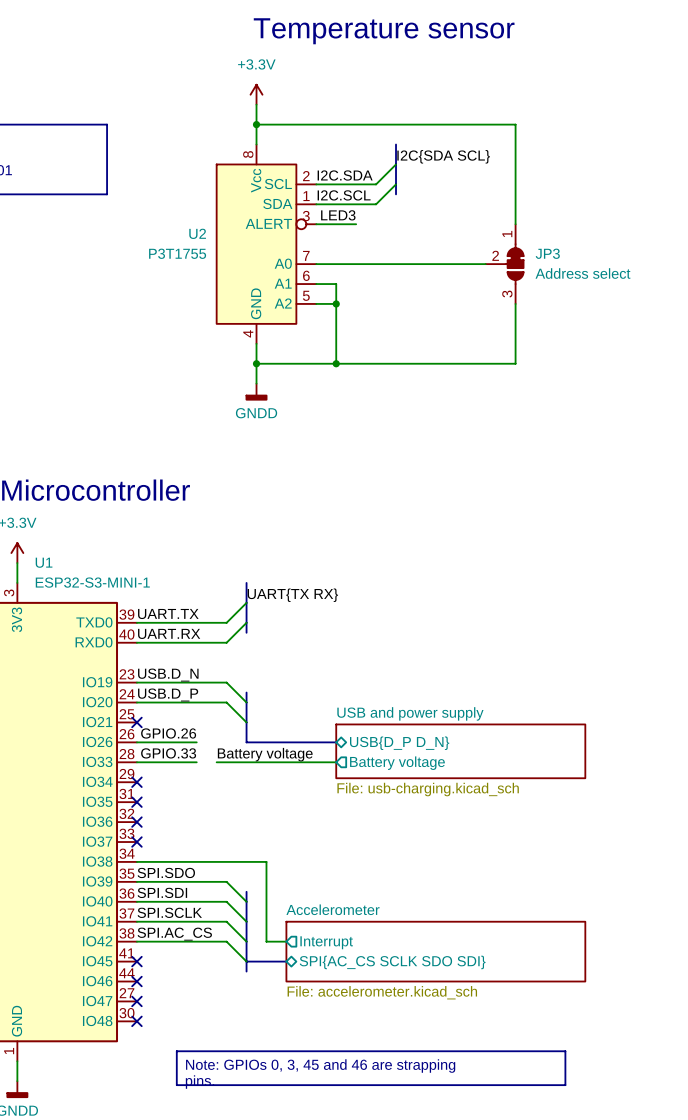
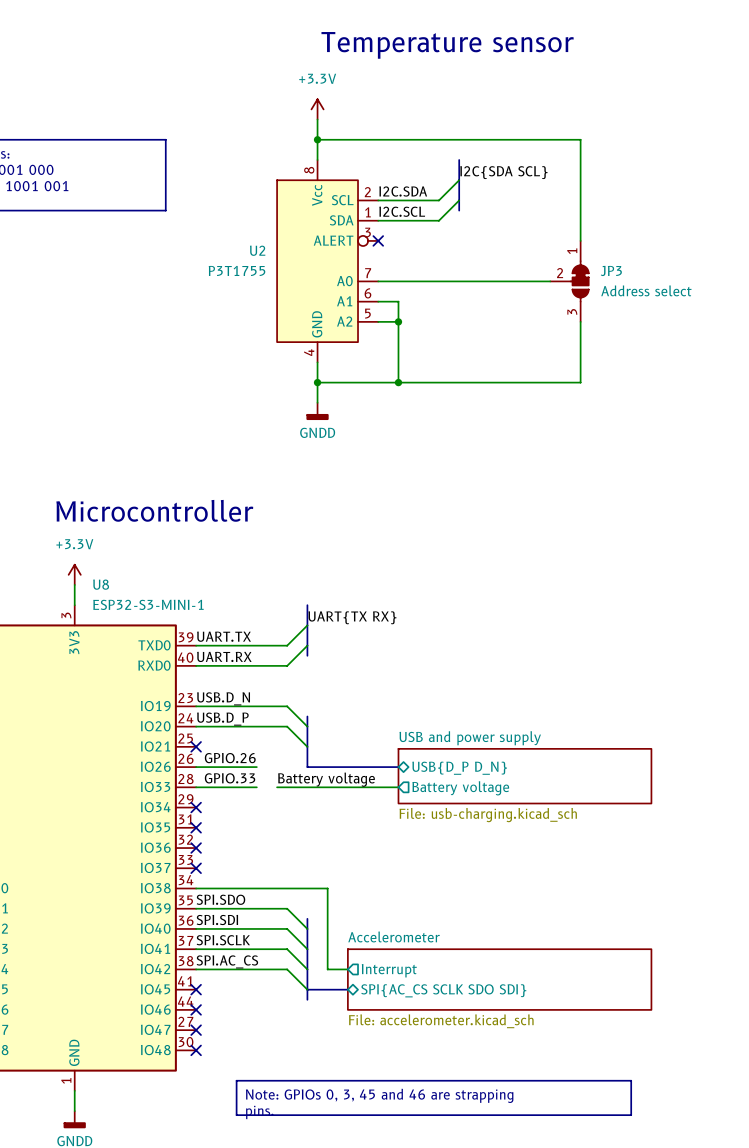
label: LED3 (338, 215) -> none
wire: (316, 224) (356, 224) -> none
no-connect mark: none -> (378, 240)
U1 name: U1 (44, 562) -> U8 (101, 584)

